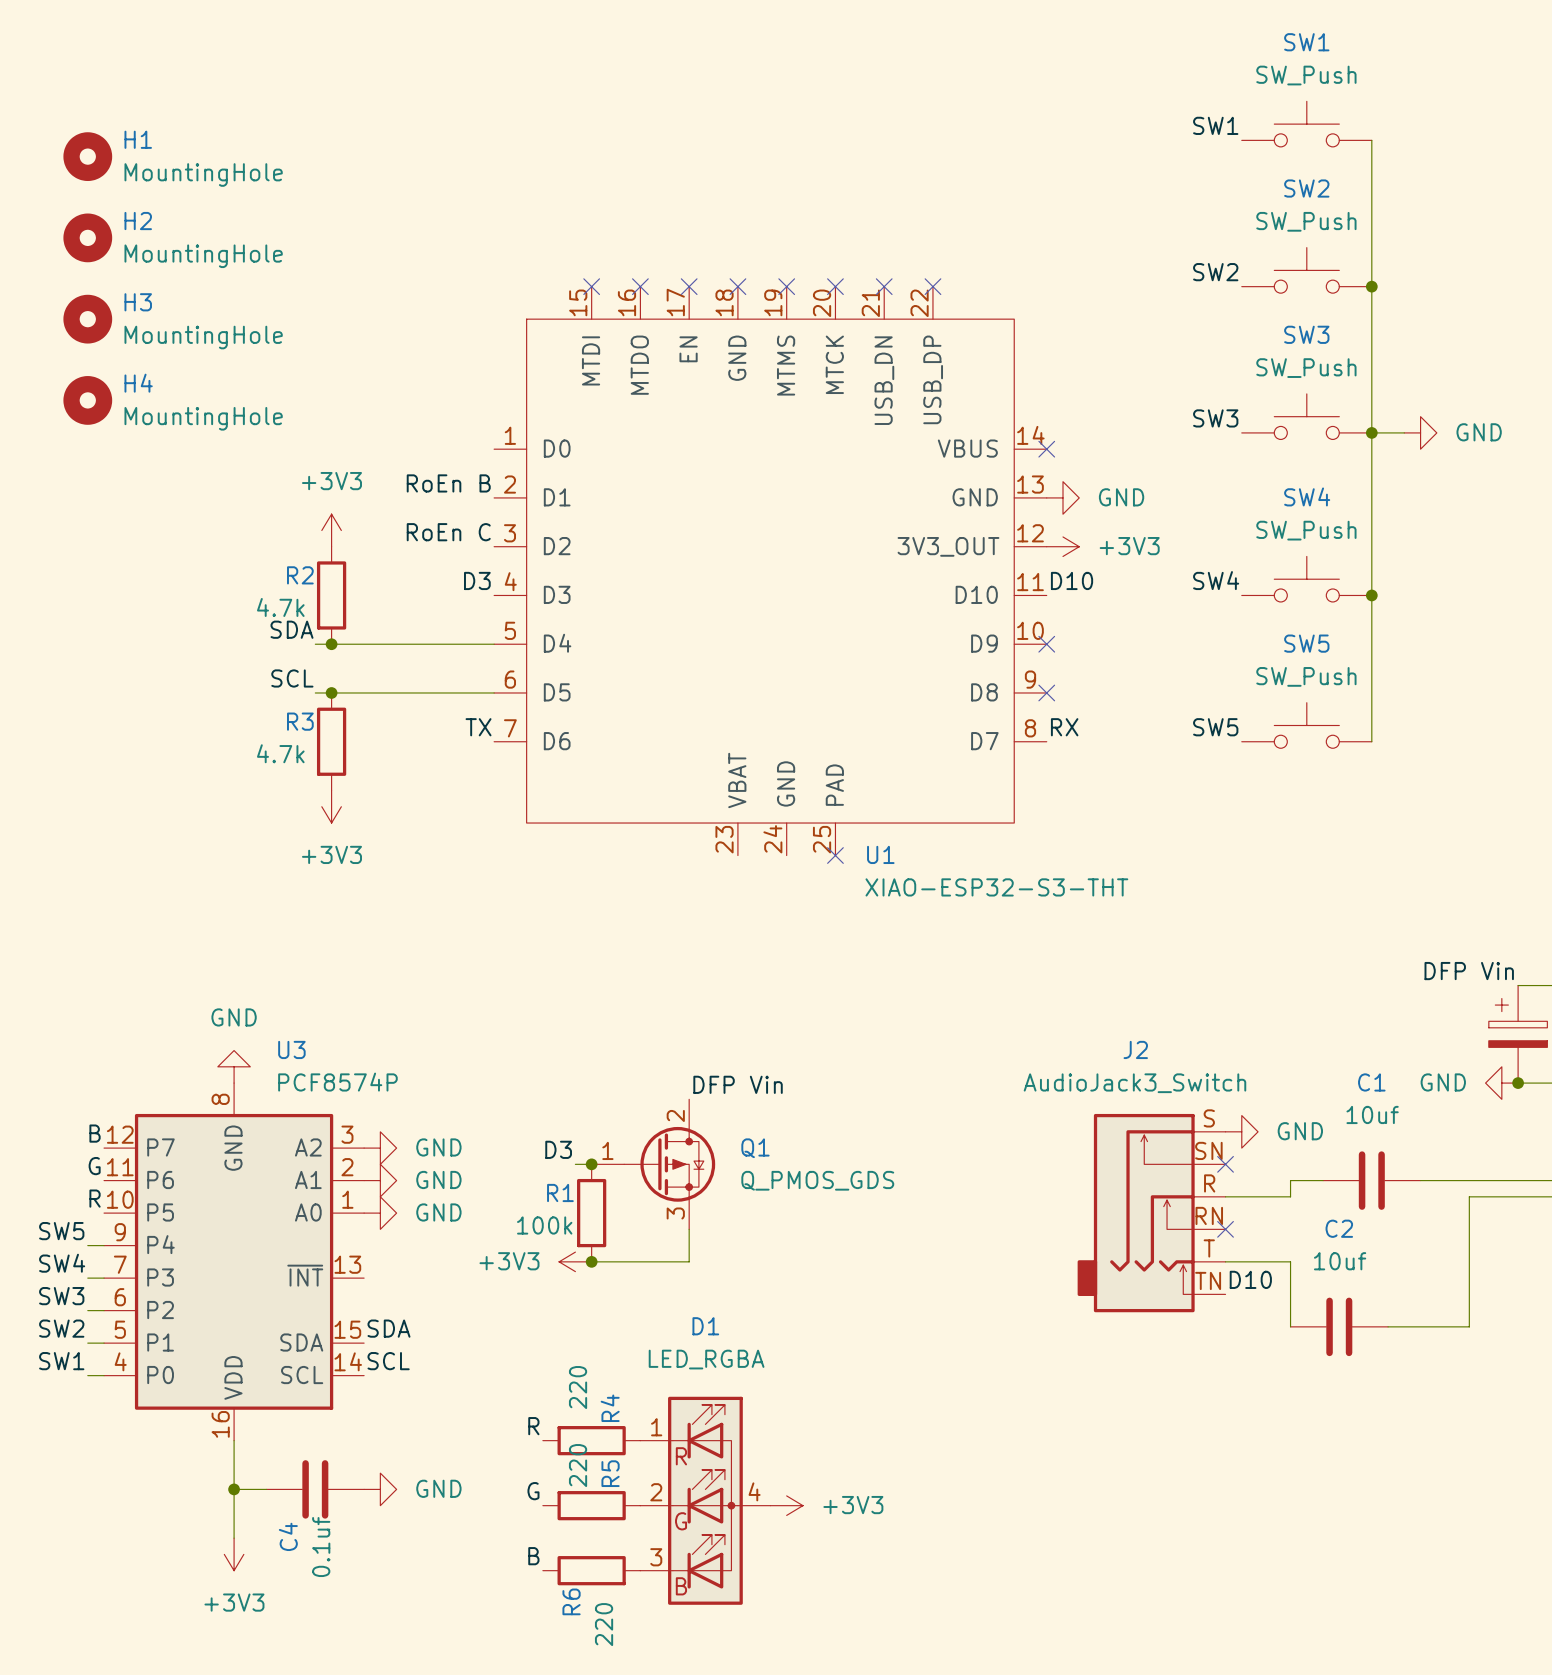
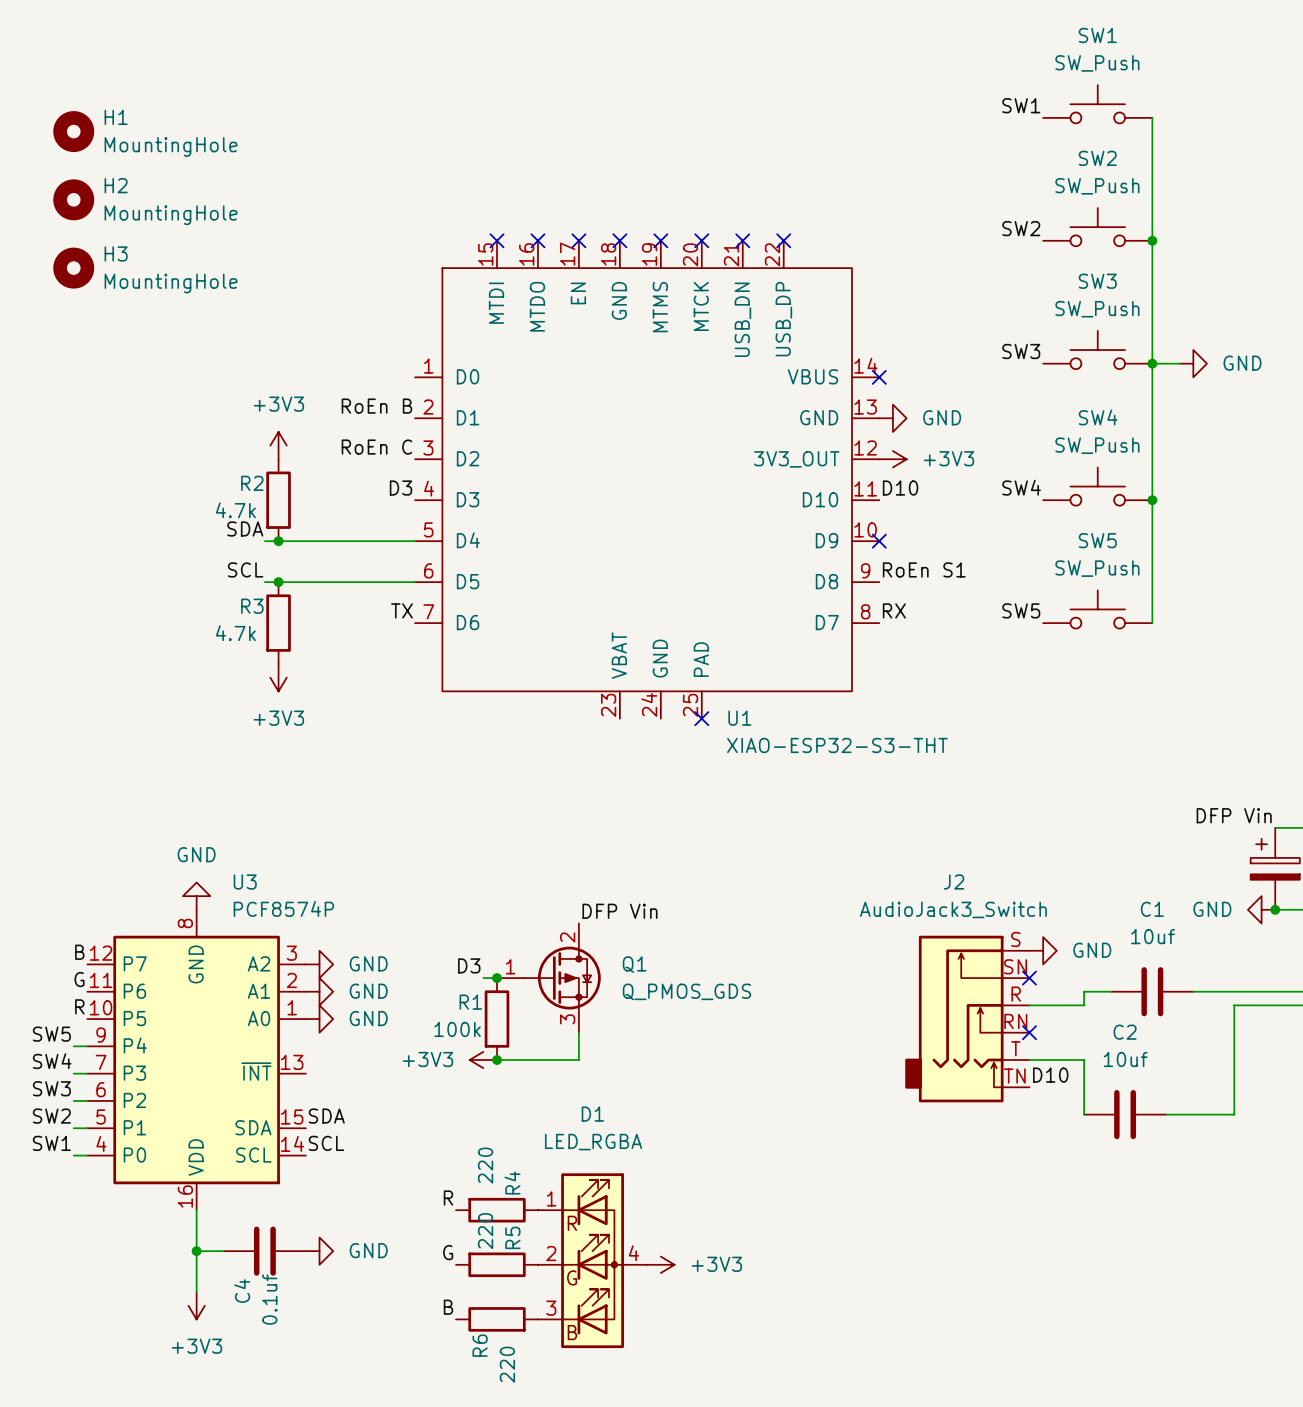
H4: MountingHole (87, 400) -> none
label: none -> RoEn S1 (924, 569)
no-connect mark: (1046, 692) -> none

